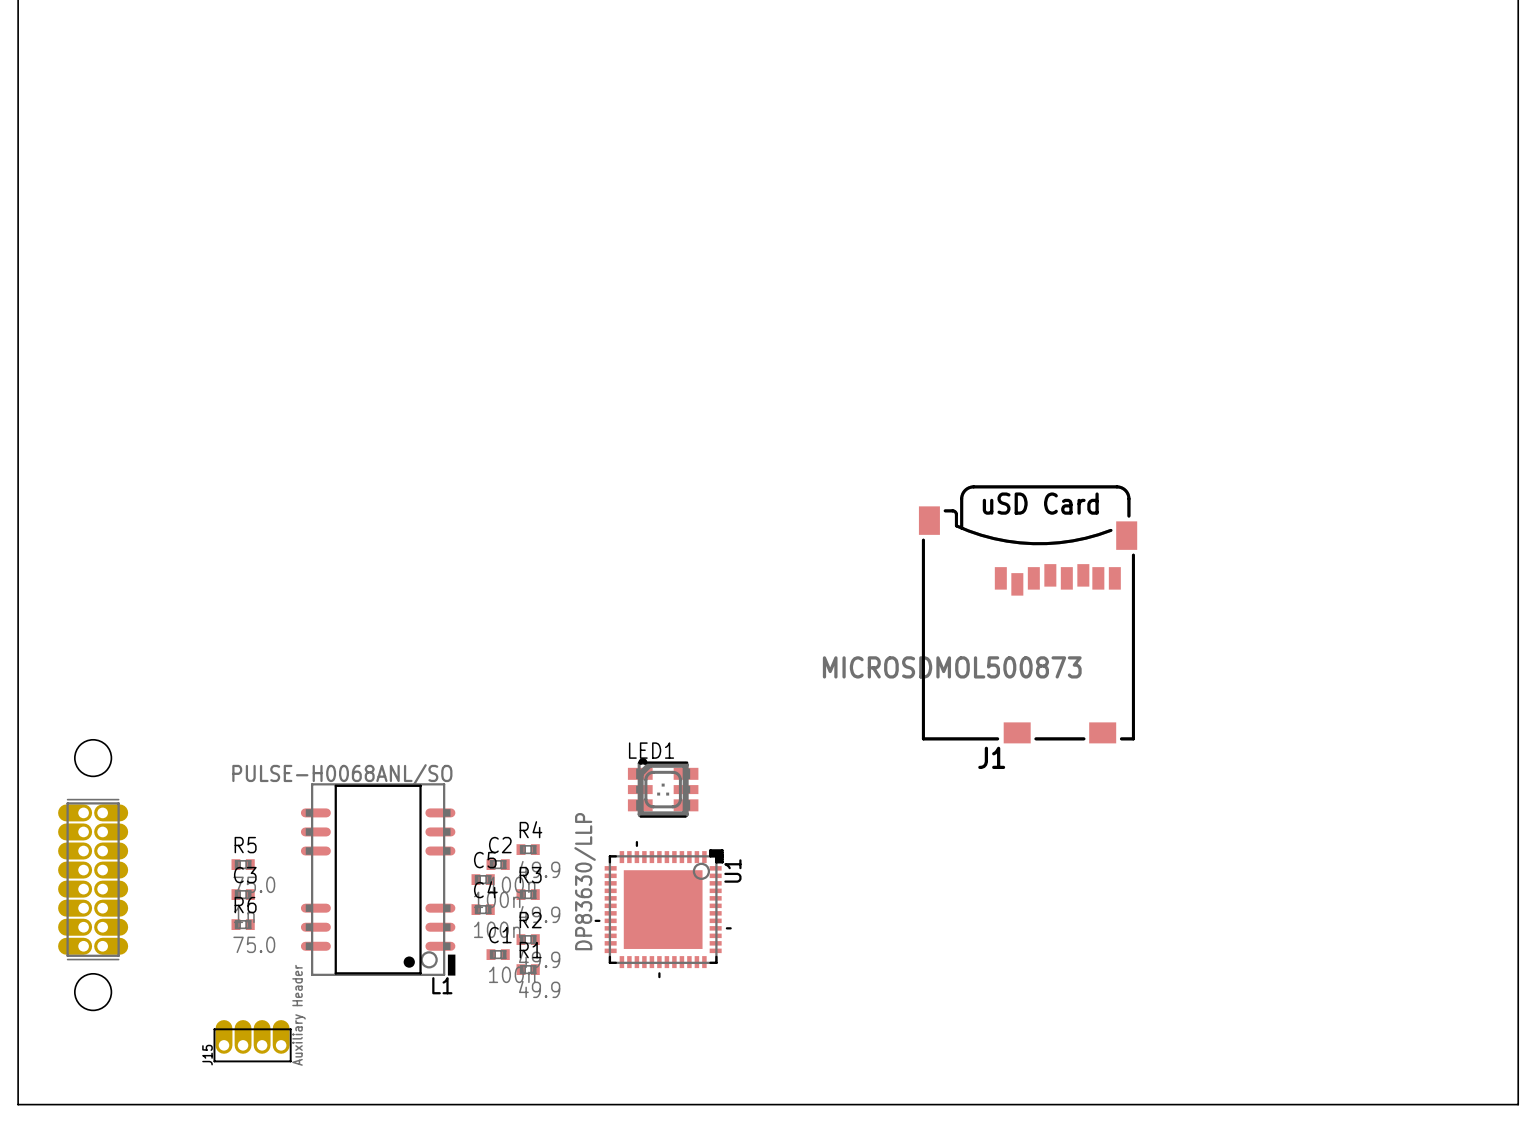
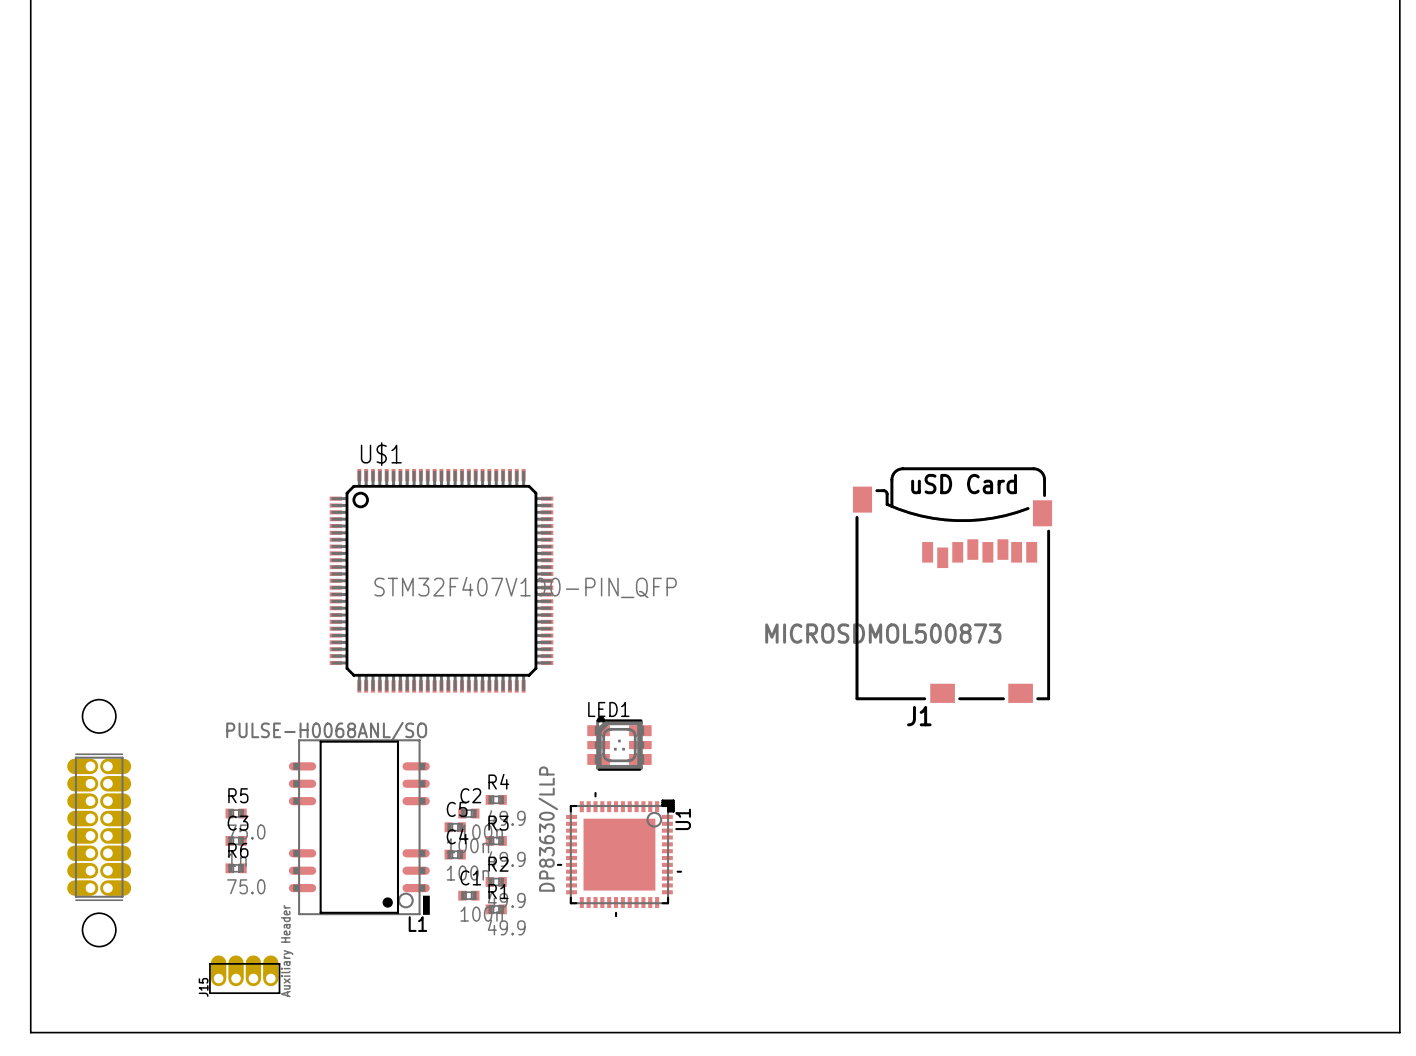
U$1: none -> STM32F407V100-PIN_QFP (441, 580)

